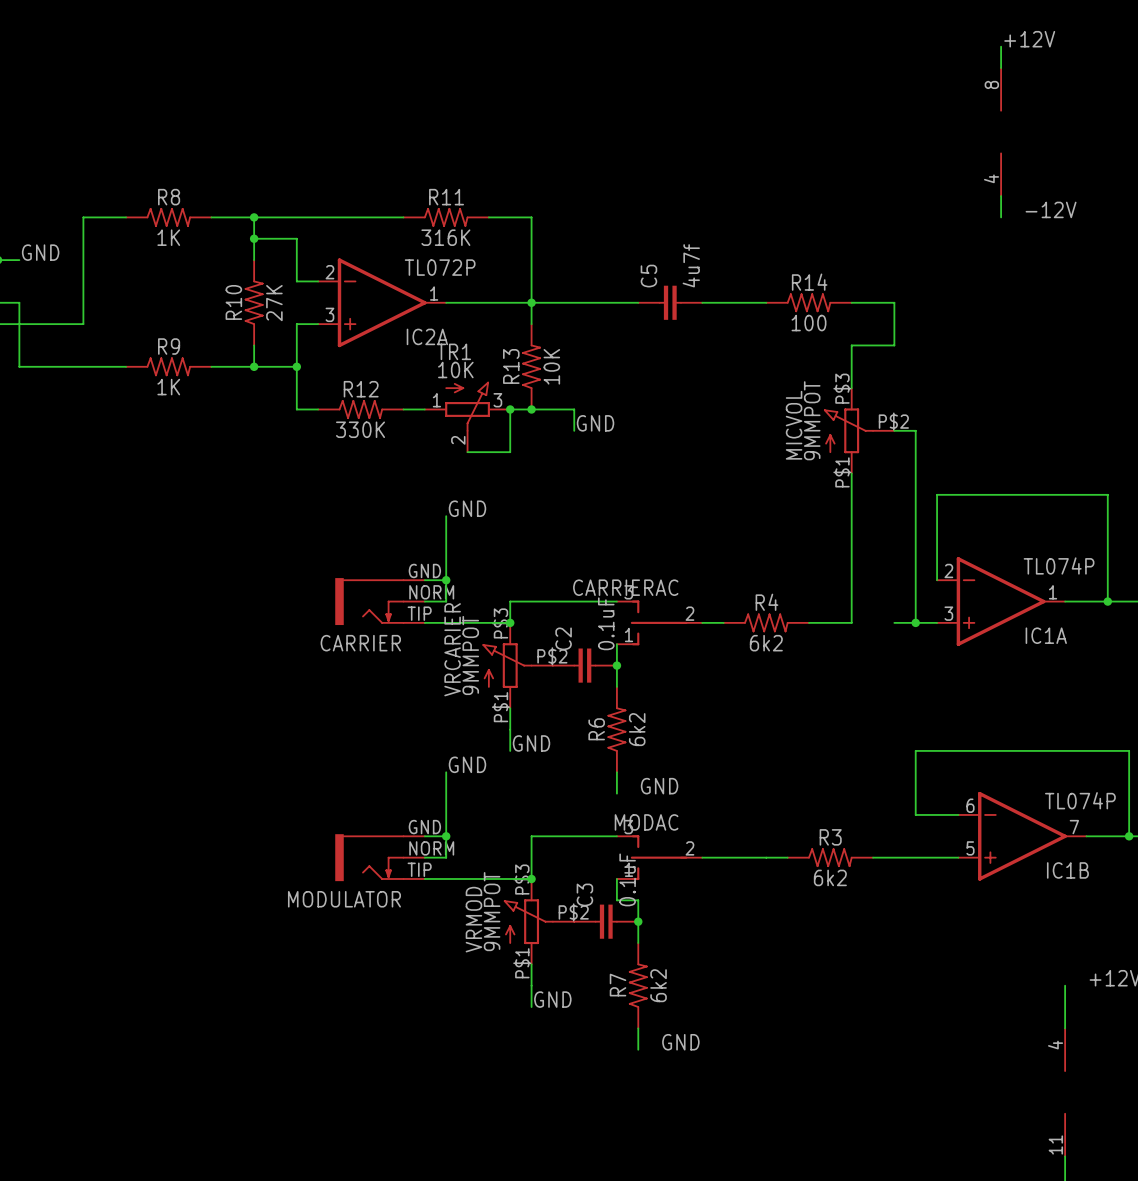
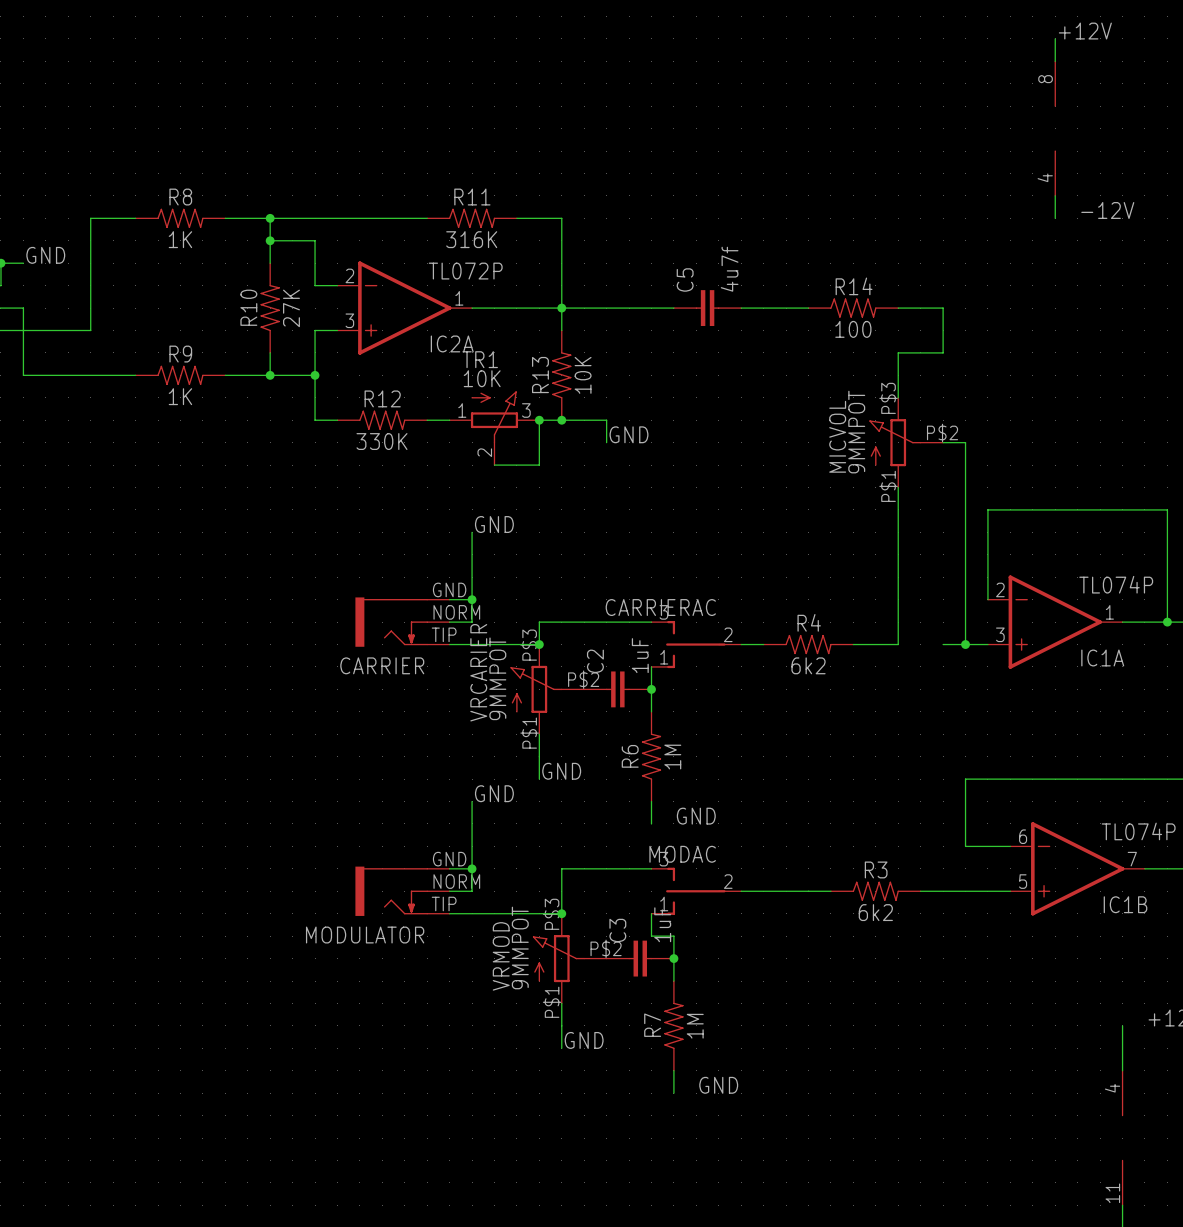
C2 value: 0.1uF (606, 623) -> 1uF (640, 655)
R6 value: 6k2 (637, 729) -> 1M (672, 757)
C3 value: 0.1uF (627, 879) -> 1uF (662, 924)
R7 value: 6k2 (658, 985) -> 1M (695, 1026)

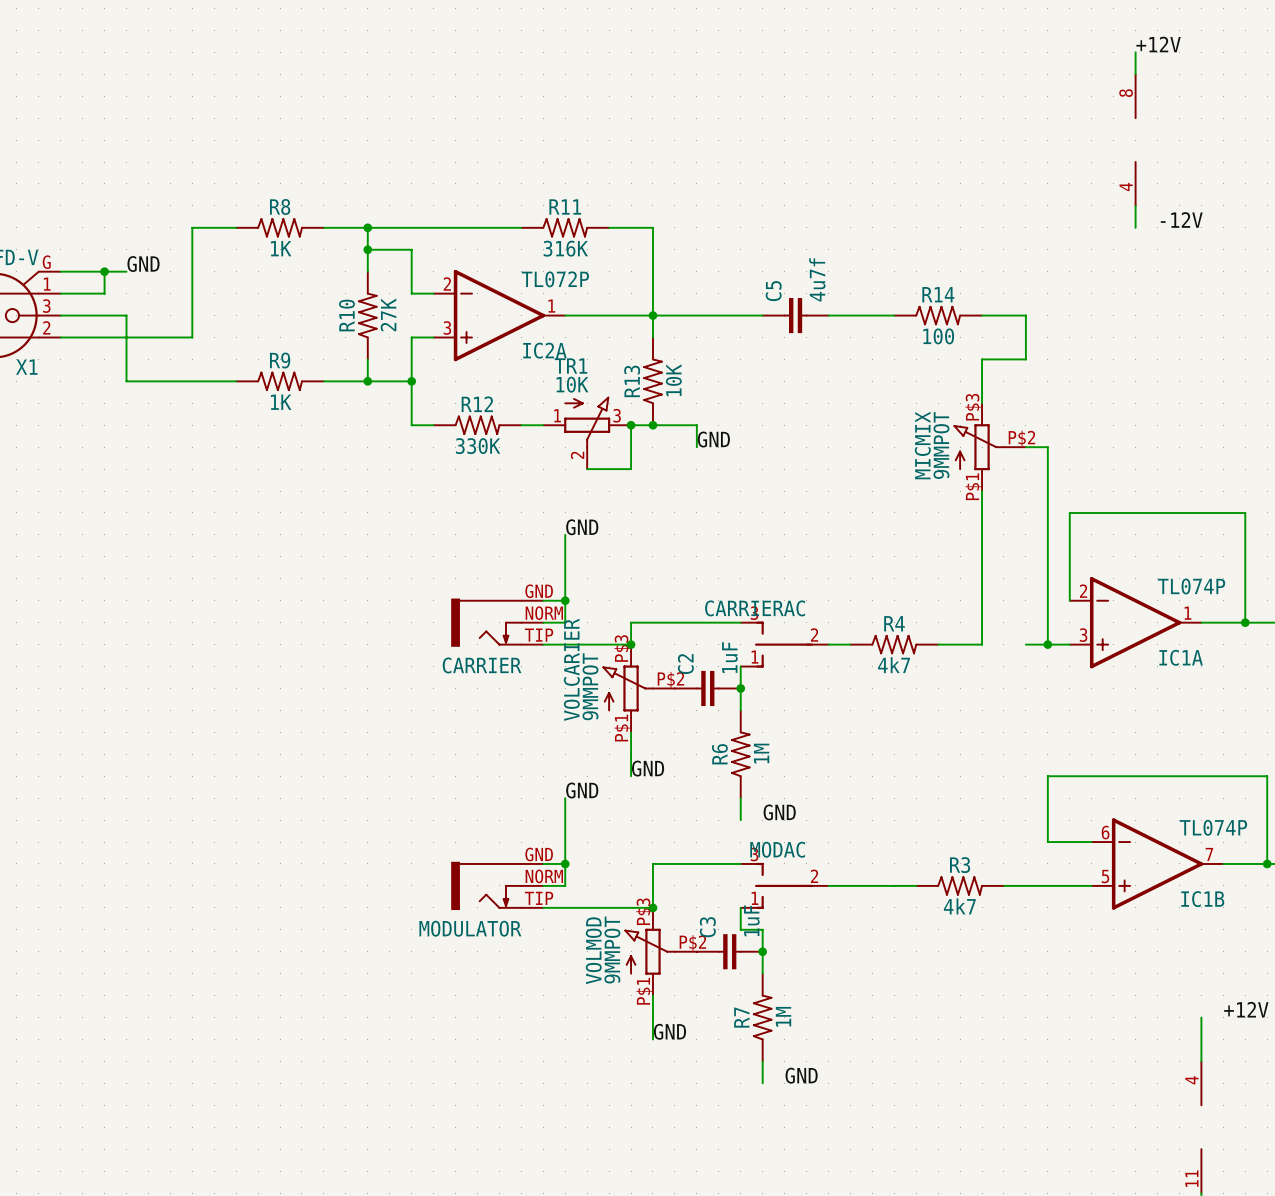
MICVOL name: MICVOL (837, 436) -> MICMIX (922, 445)
R4 value: 6k2 (808, 665) -> 4k7 (894, 665)
VRCARIER name: VRCARIER (478, 672) -> VOLCARIER (571, 669)
R3 value: 6k2 (875, 912) -> 4k7 (959, 906)
VRMOD name: VRMOD (501, 956) -> VOLMOD (593, 950)

